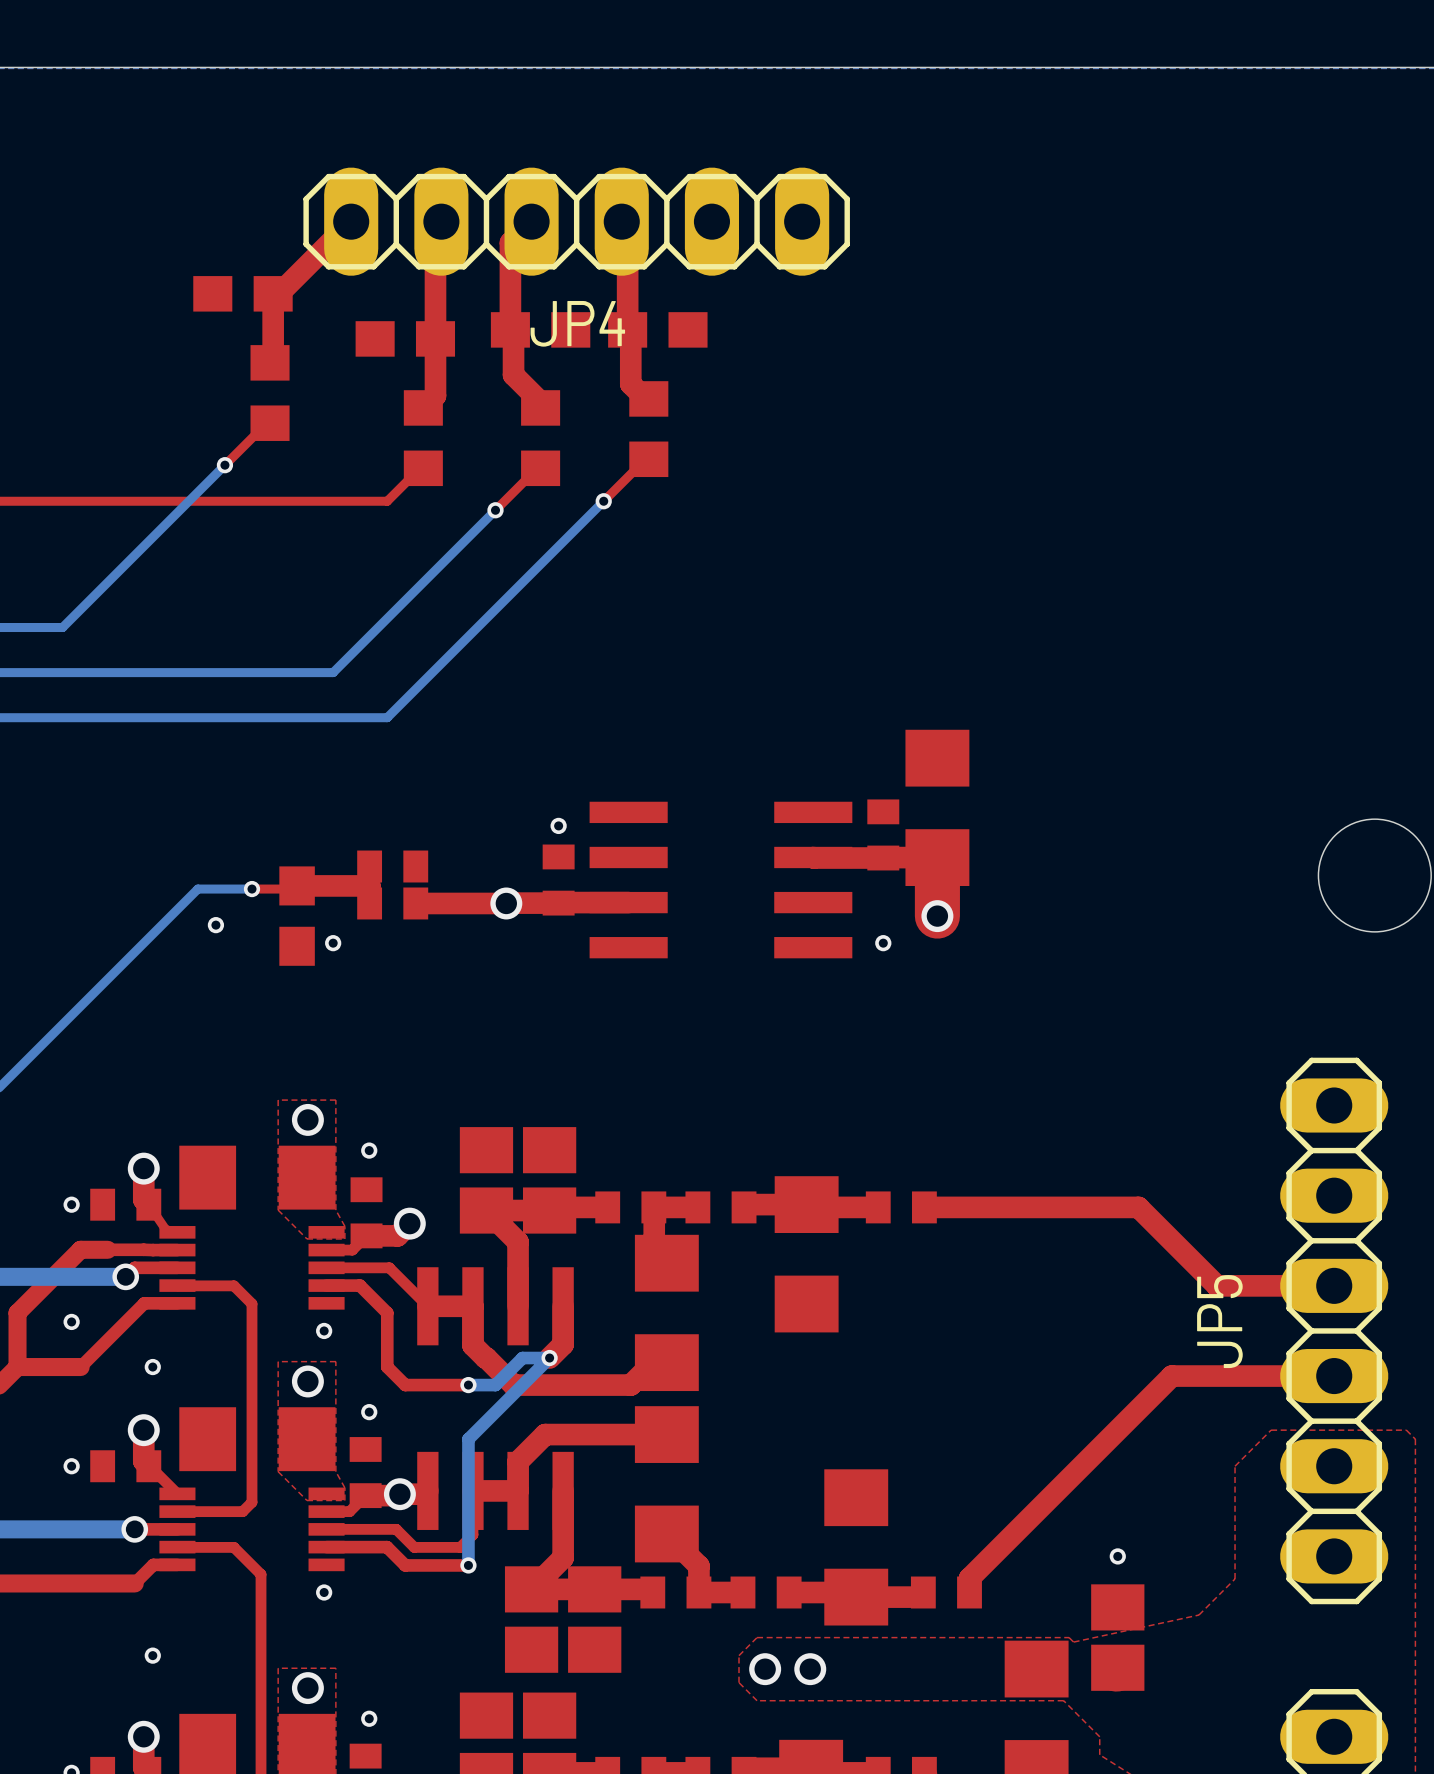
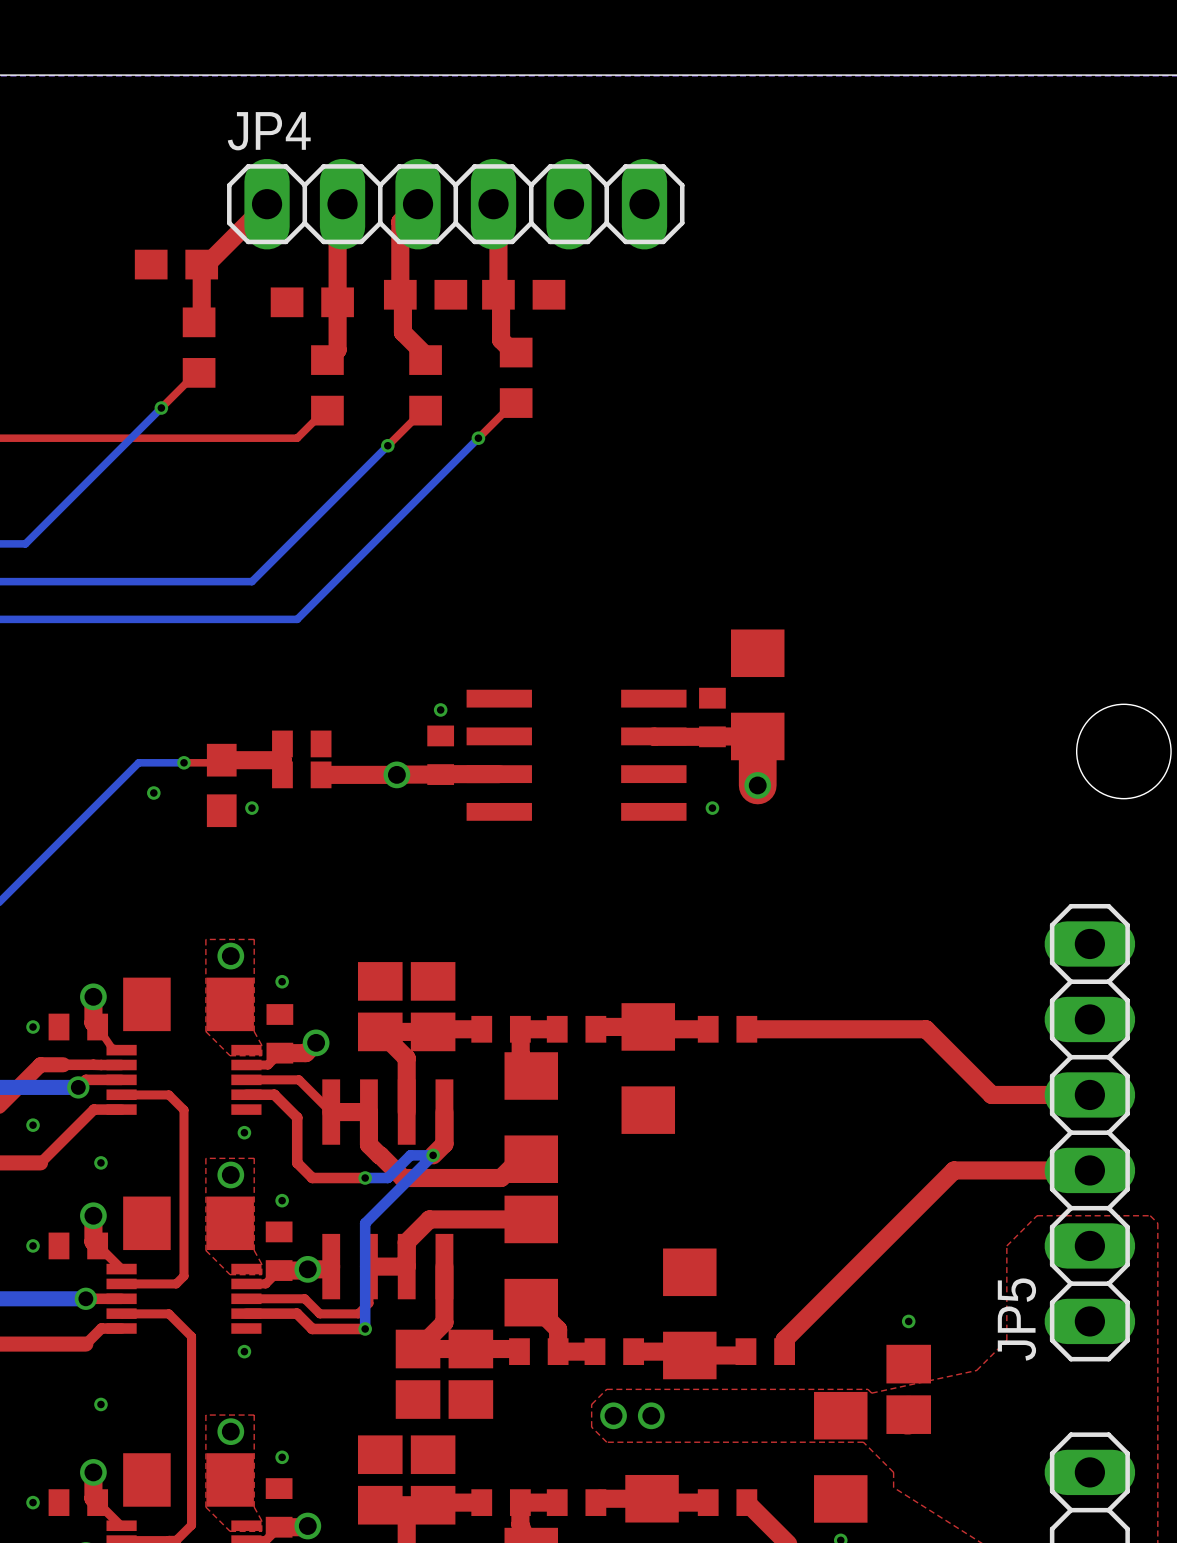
JP4 name position: JP4 (577, 323) -> JP4 (269, 131)
JP5 name position: JP5 (1219, 1321) -> JP5 (1016, 1319)

